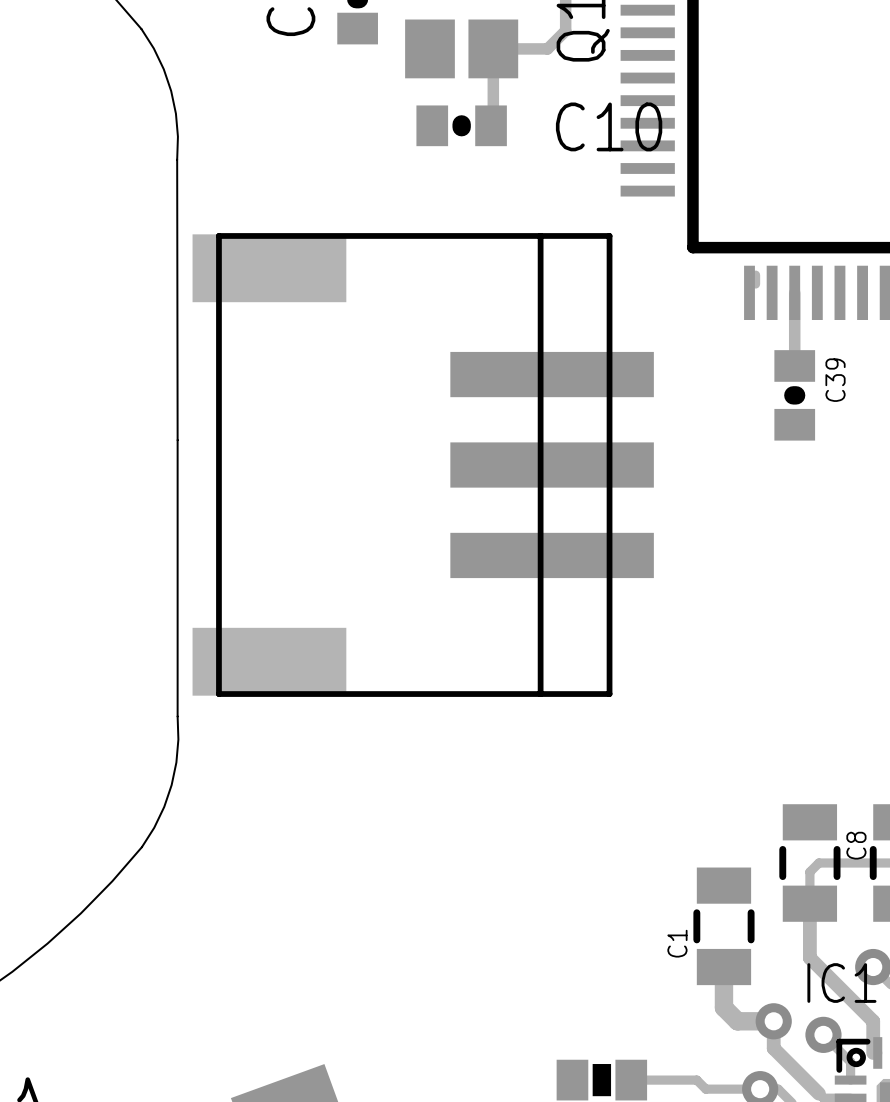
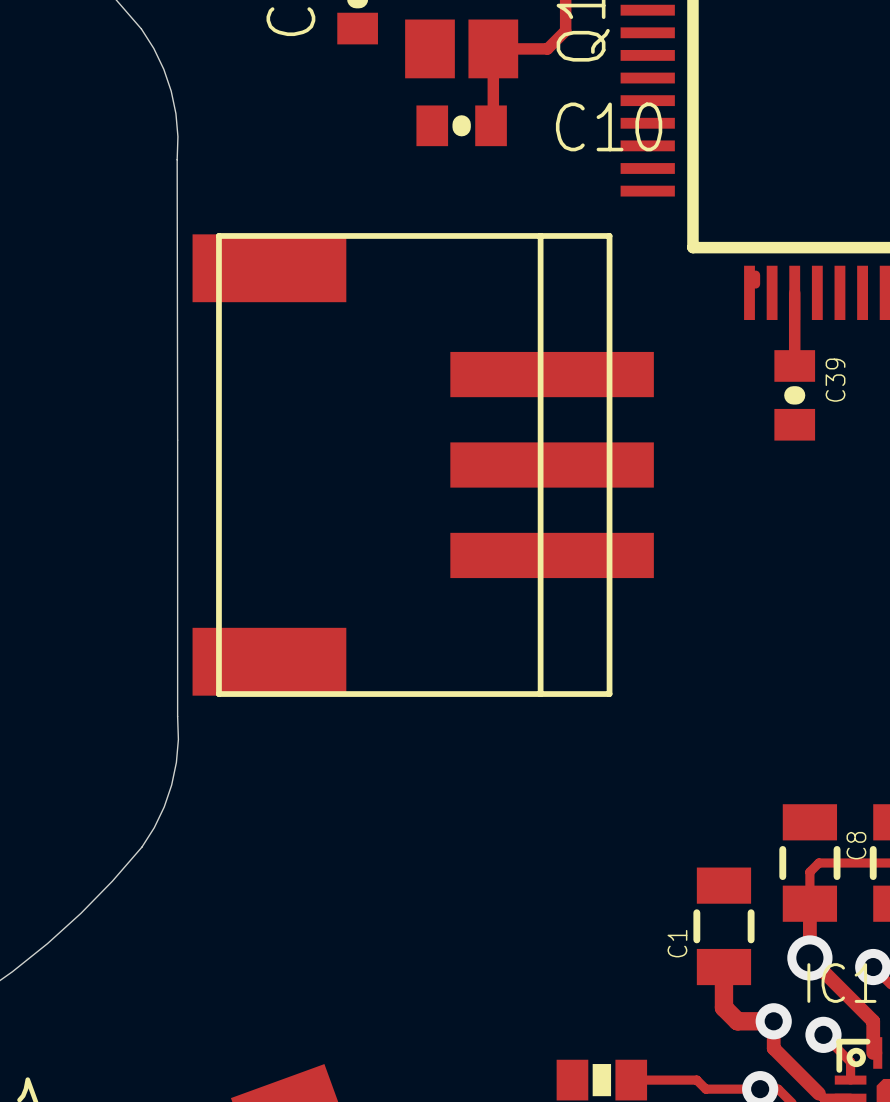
via: none -> (809, 957)

